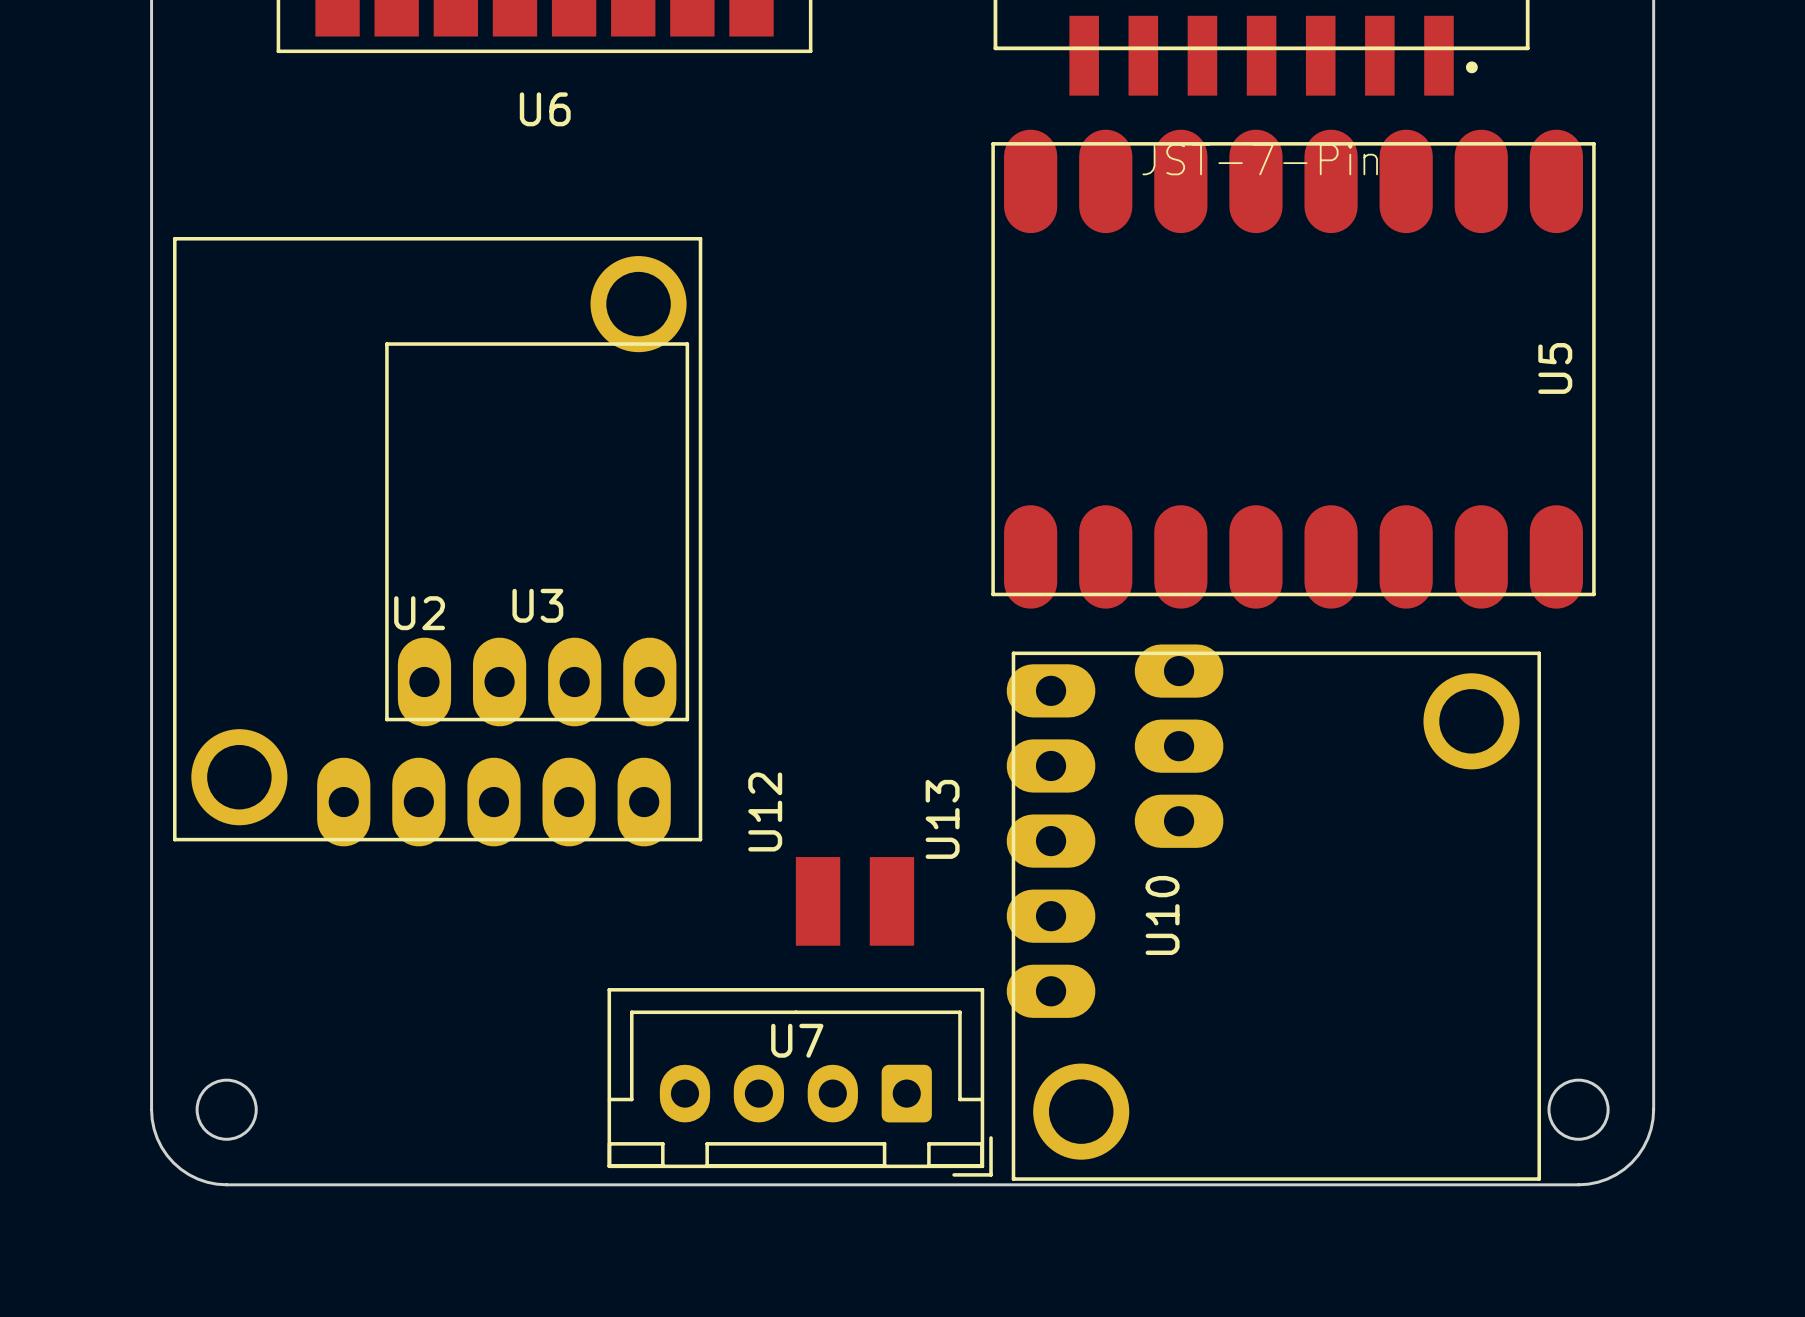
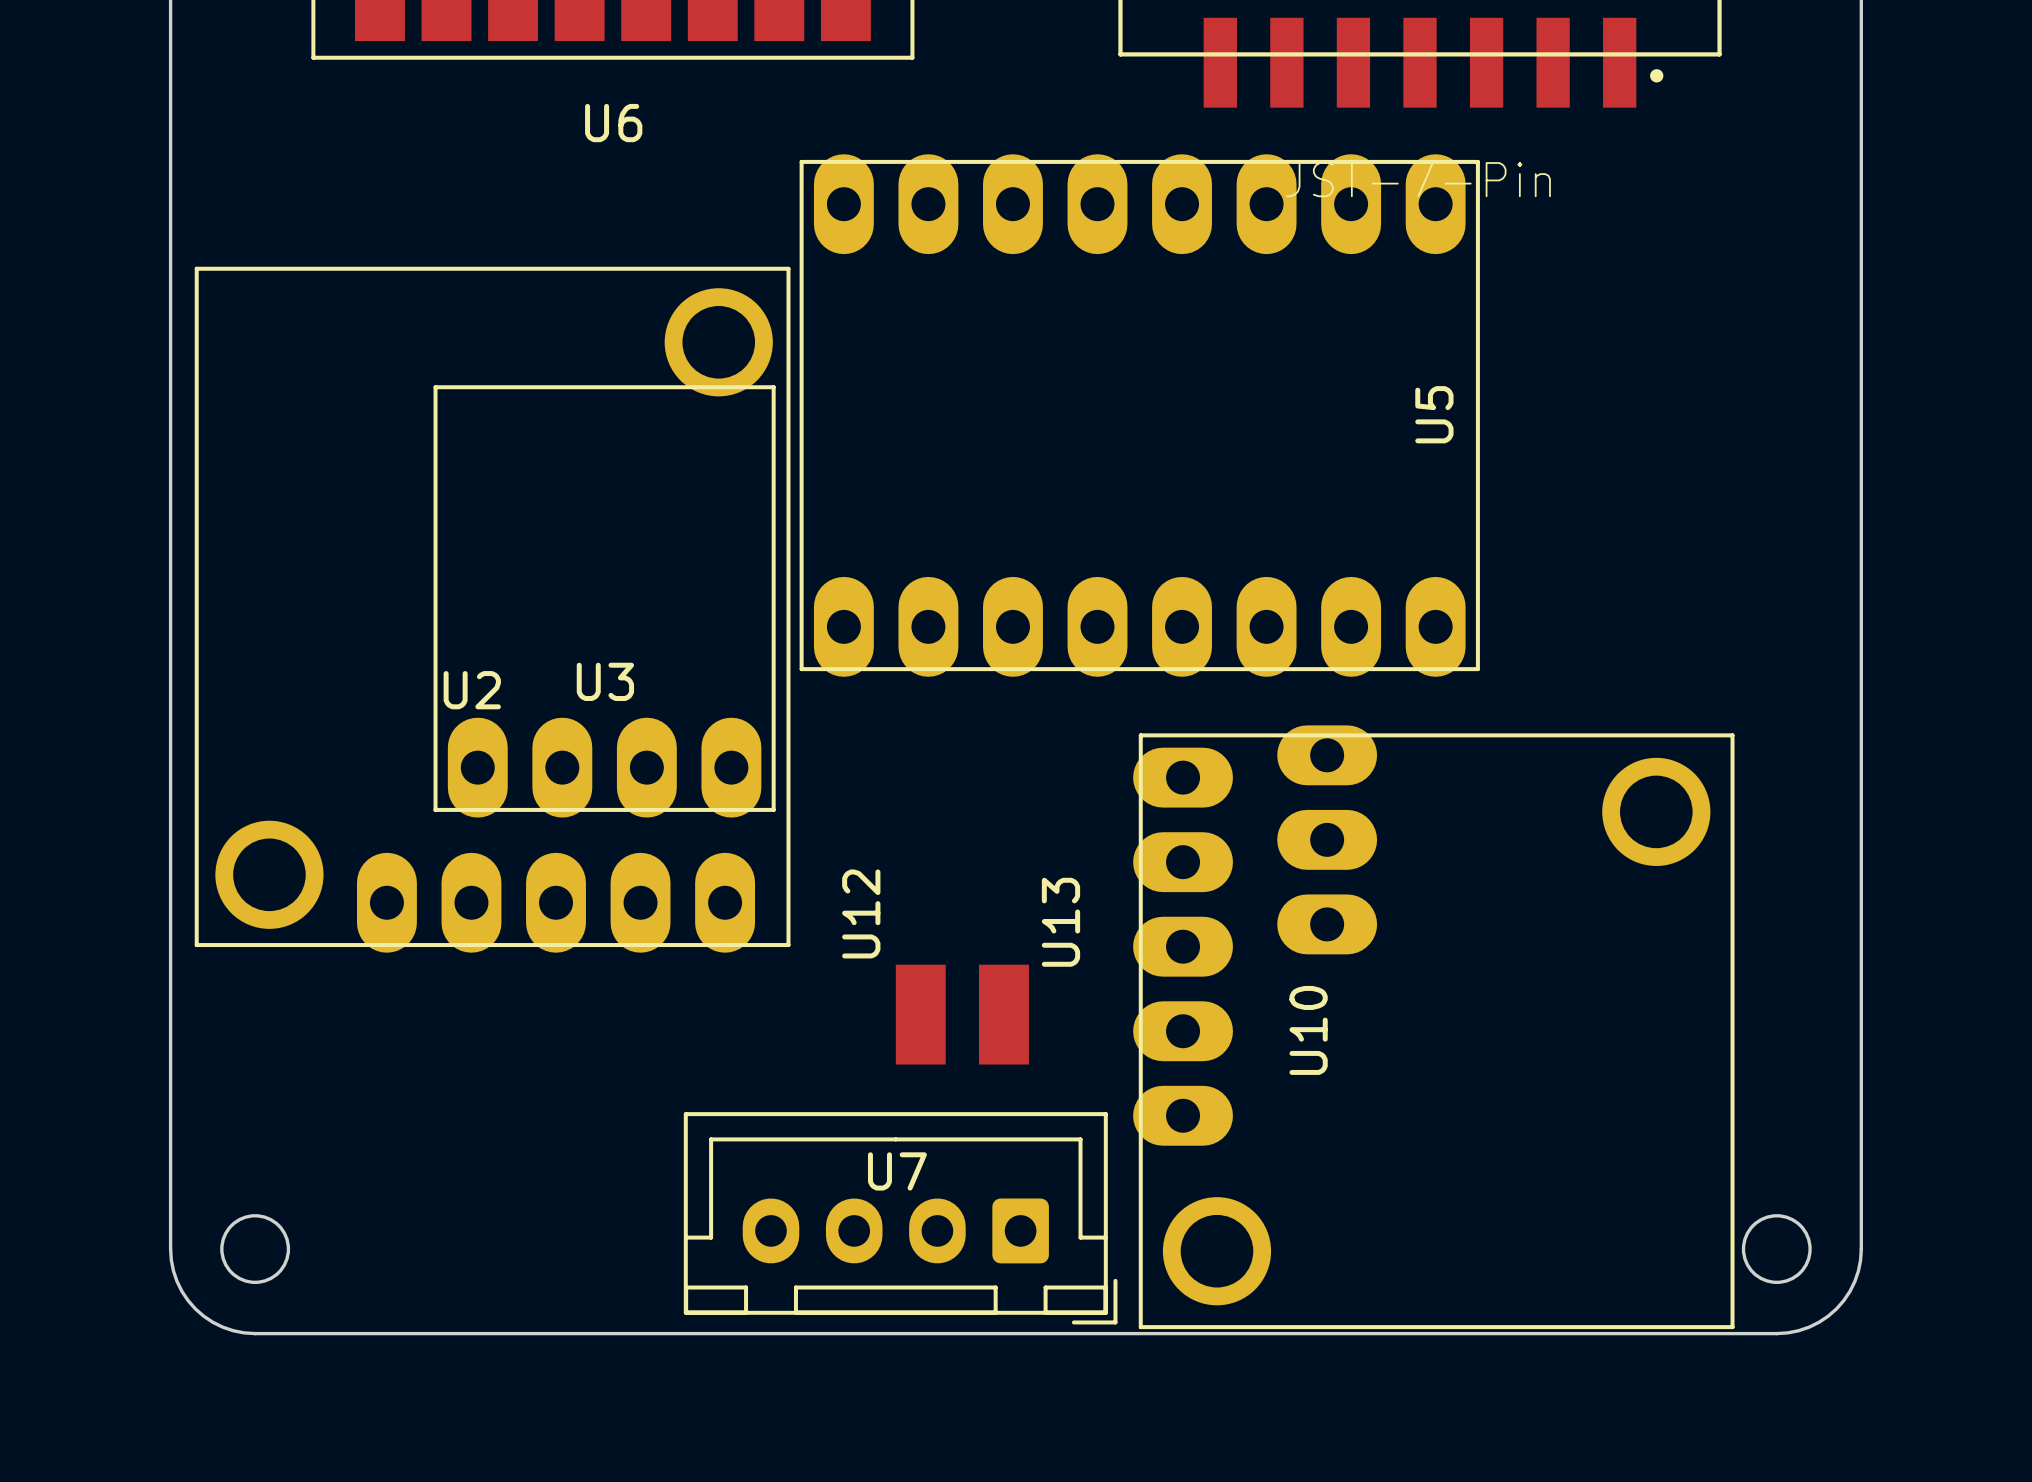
U5 footprint: [991, 129, 1596, 609] -> [799, 154, 1480, 677]

